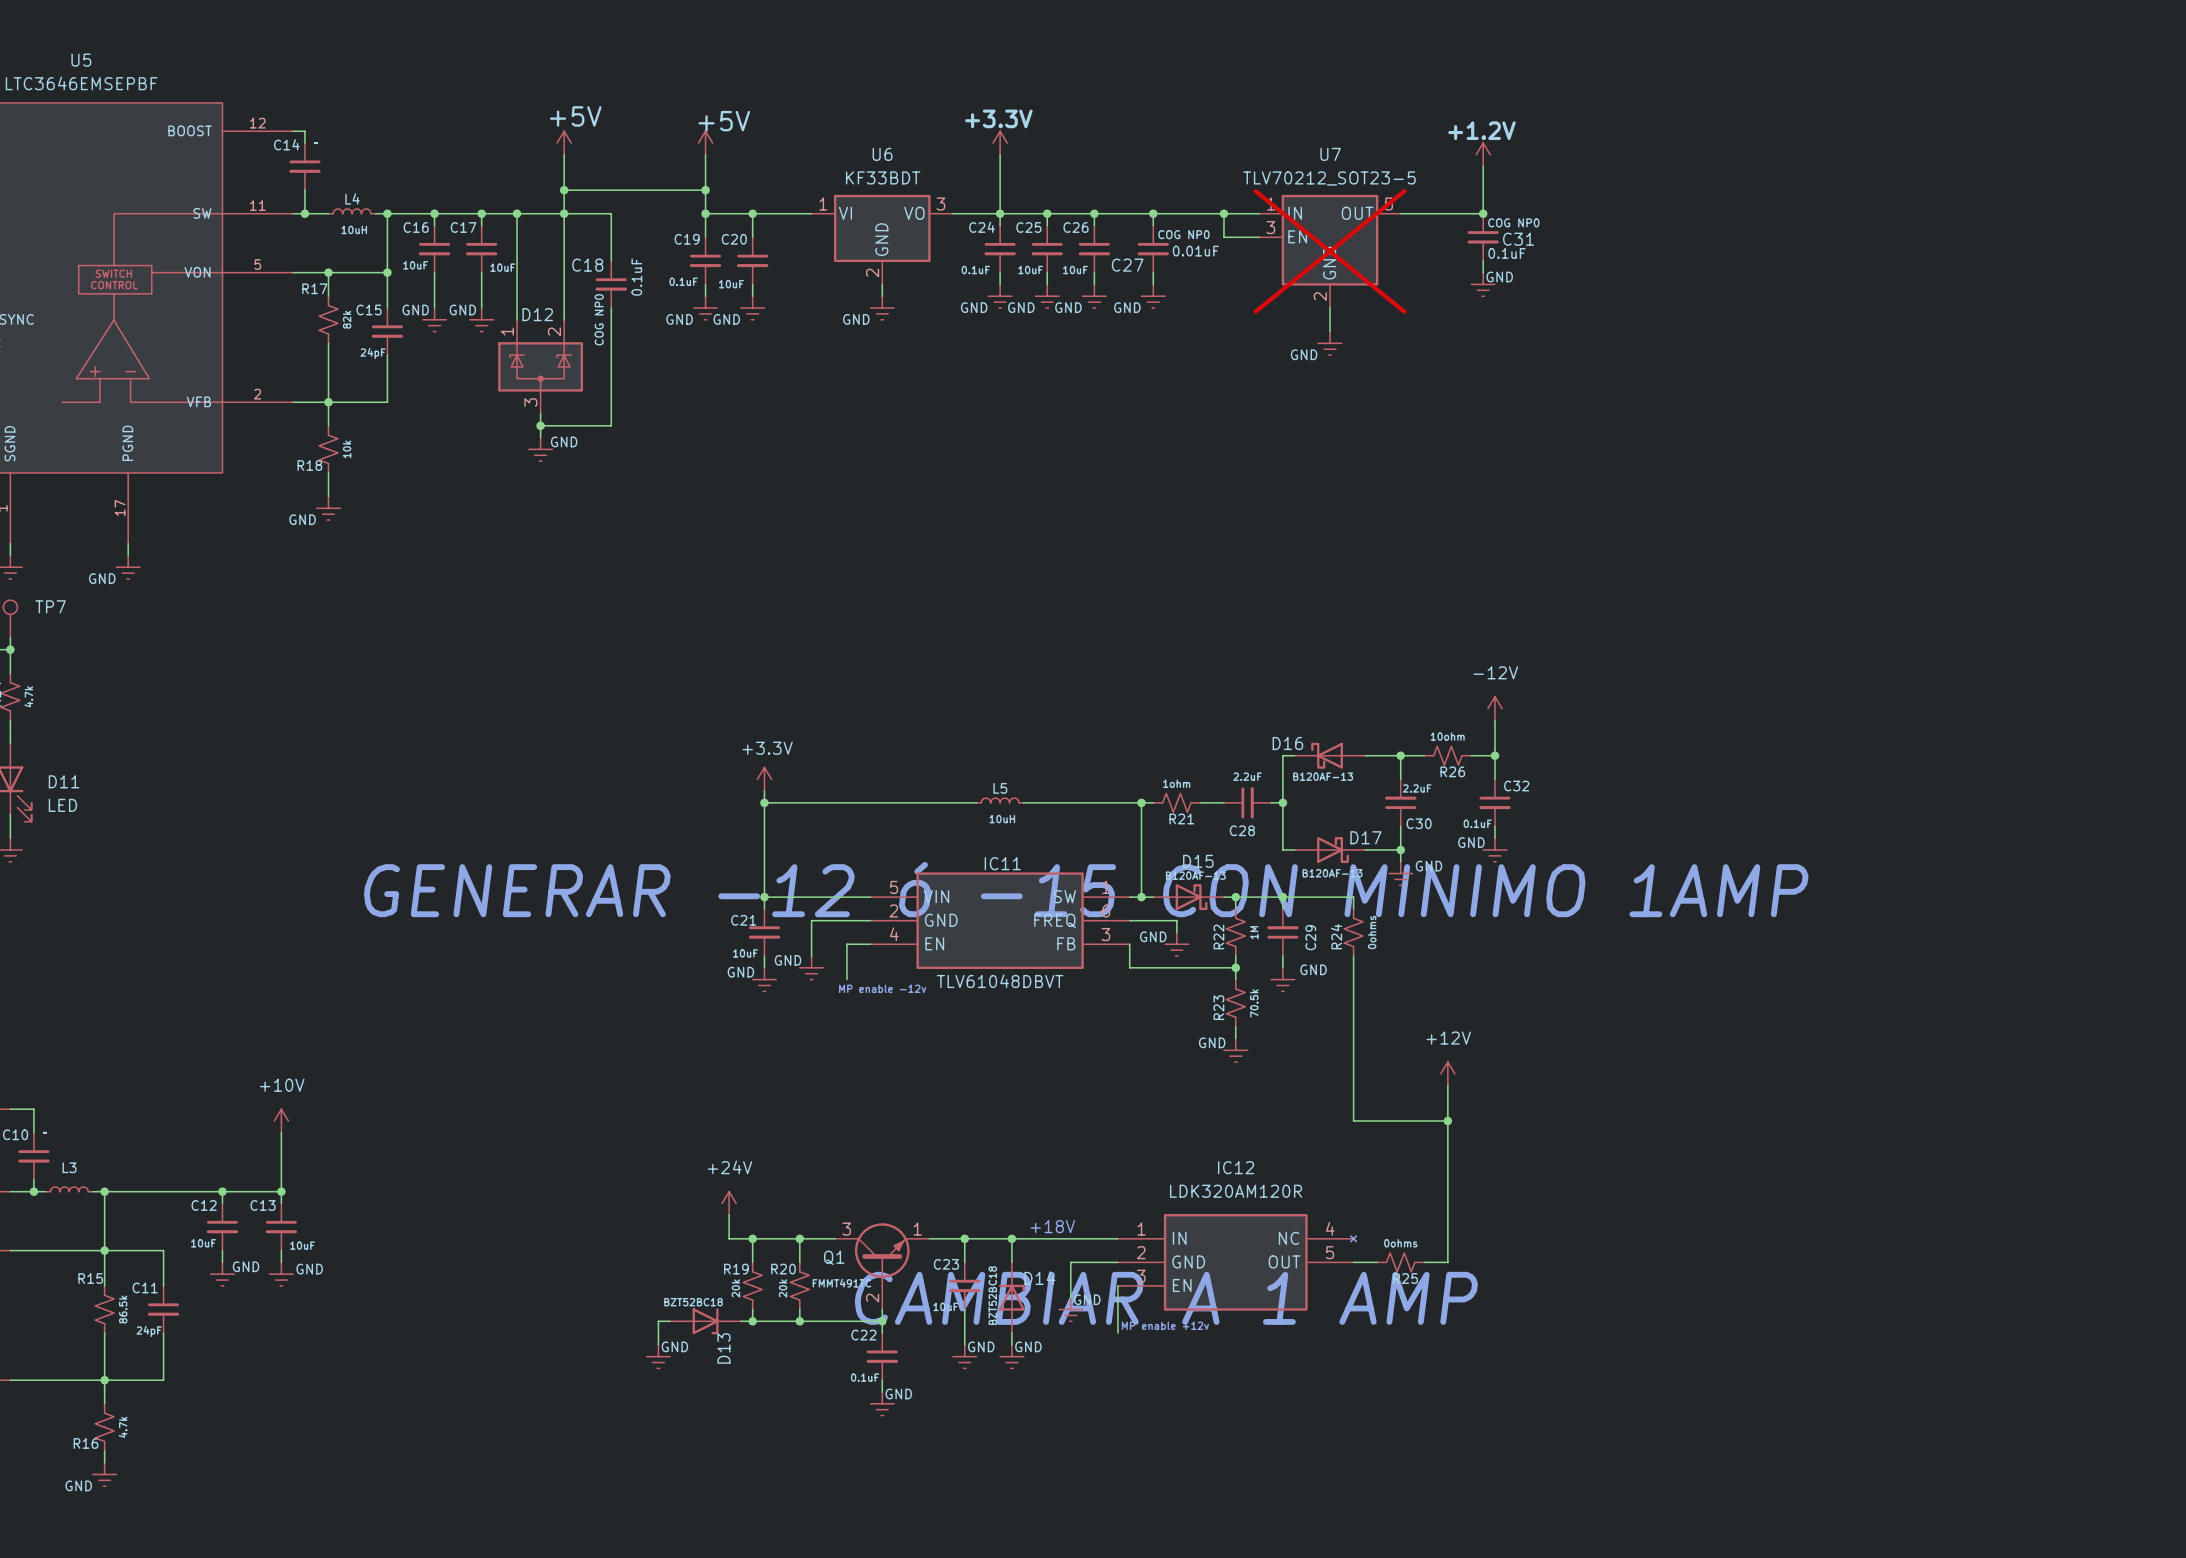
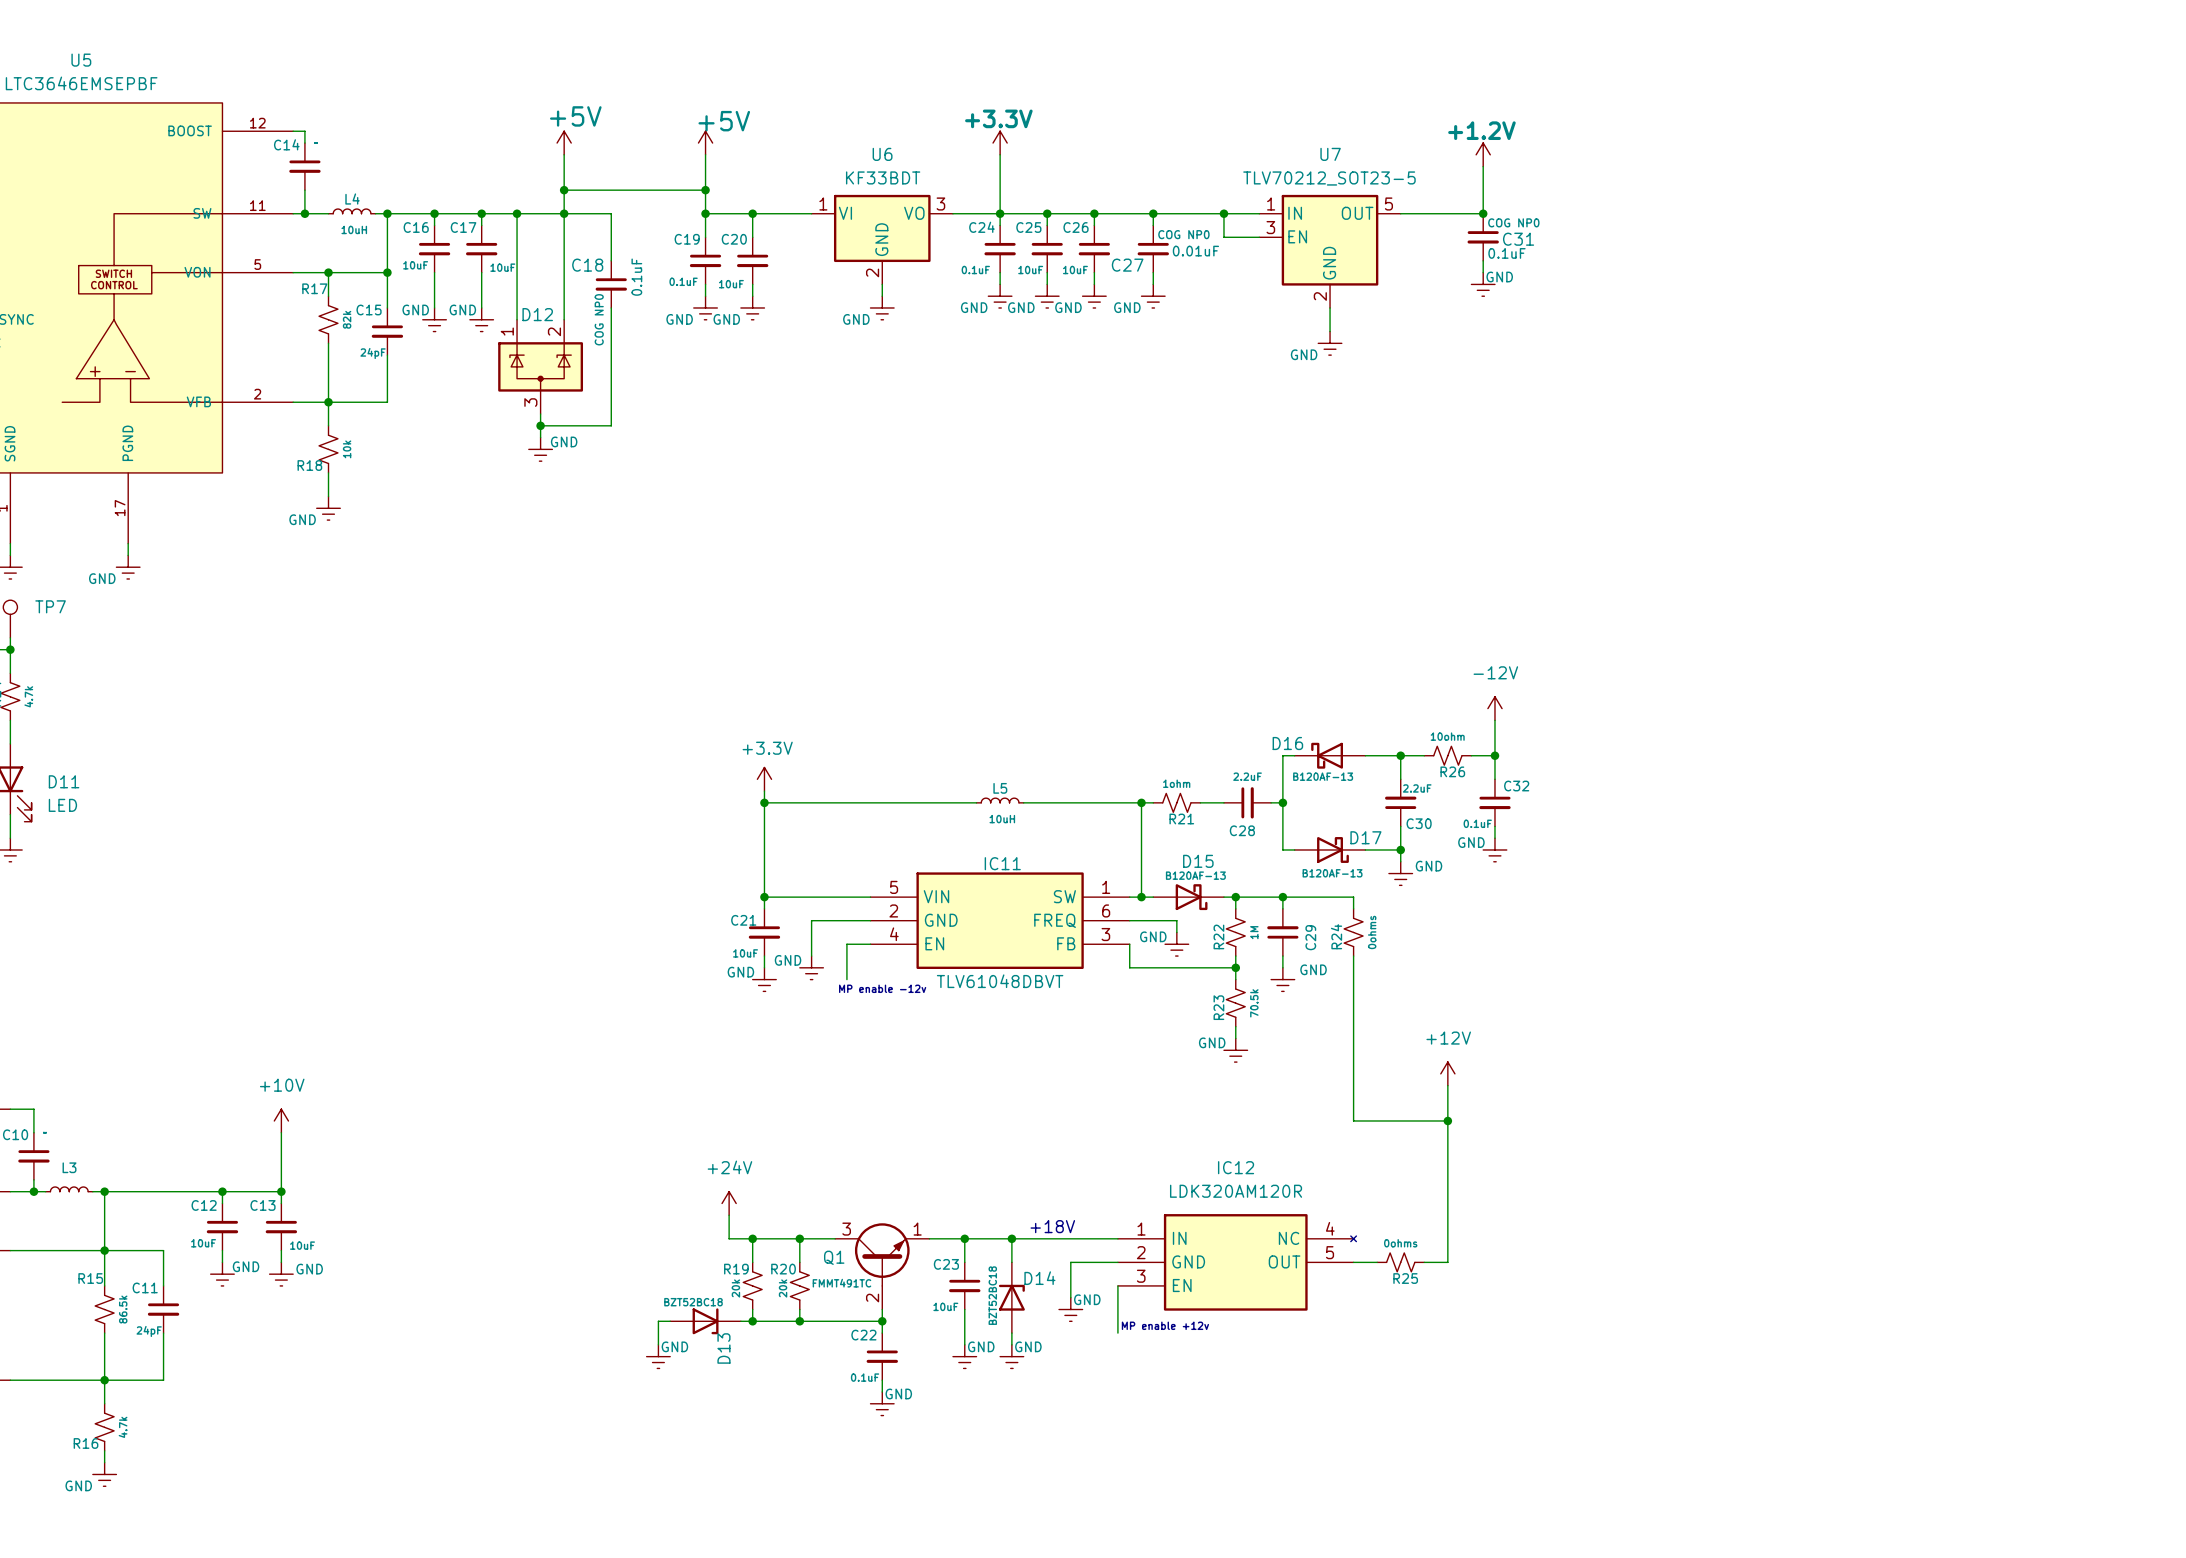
U7 do-not-place cross: (1330, 251) -> none
text: GENERAR -12 ó -15 CON MINIMO 1AMP (1086, 889) -> none
text: CAMBIAR A 1 AMP (1166, 1298) -> none

